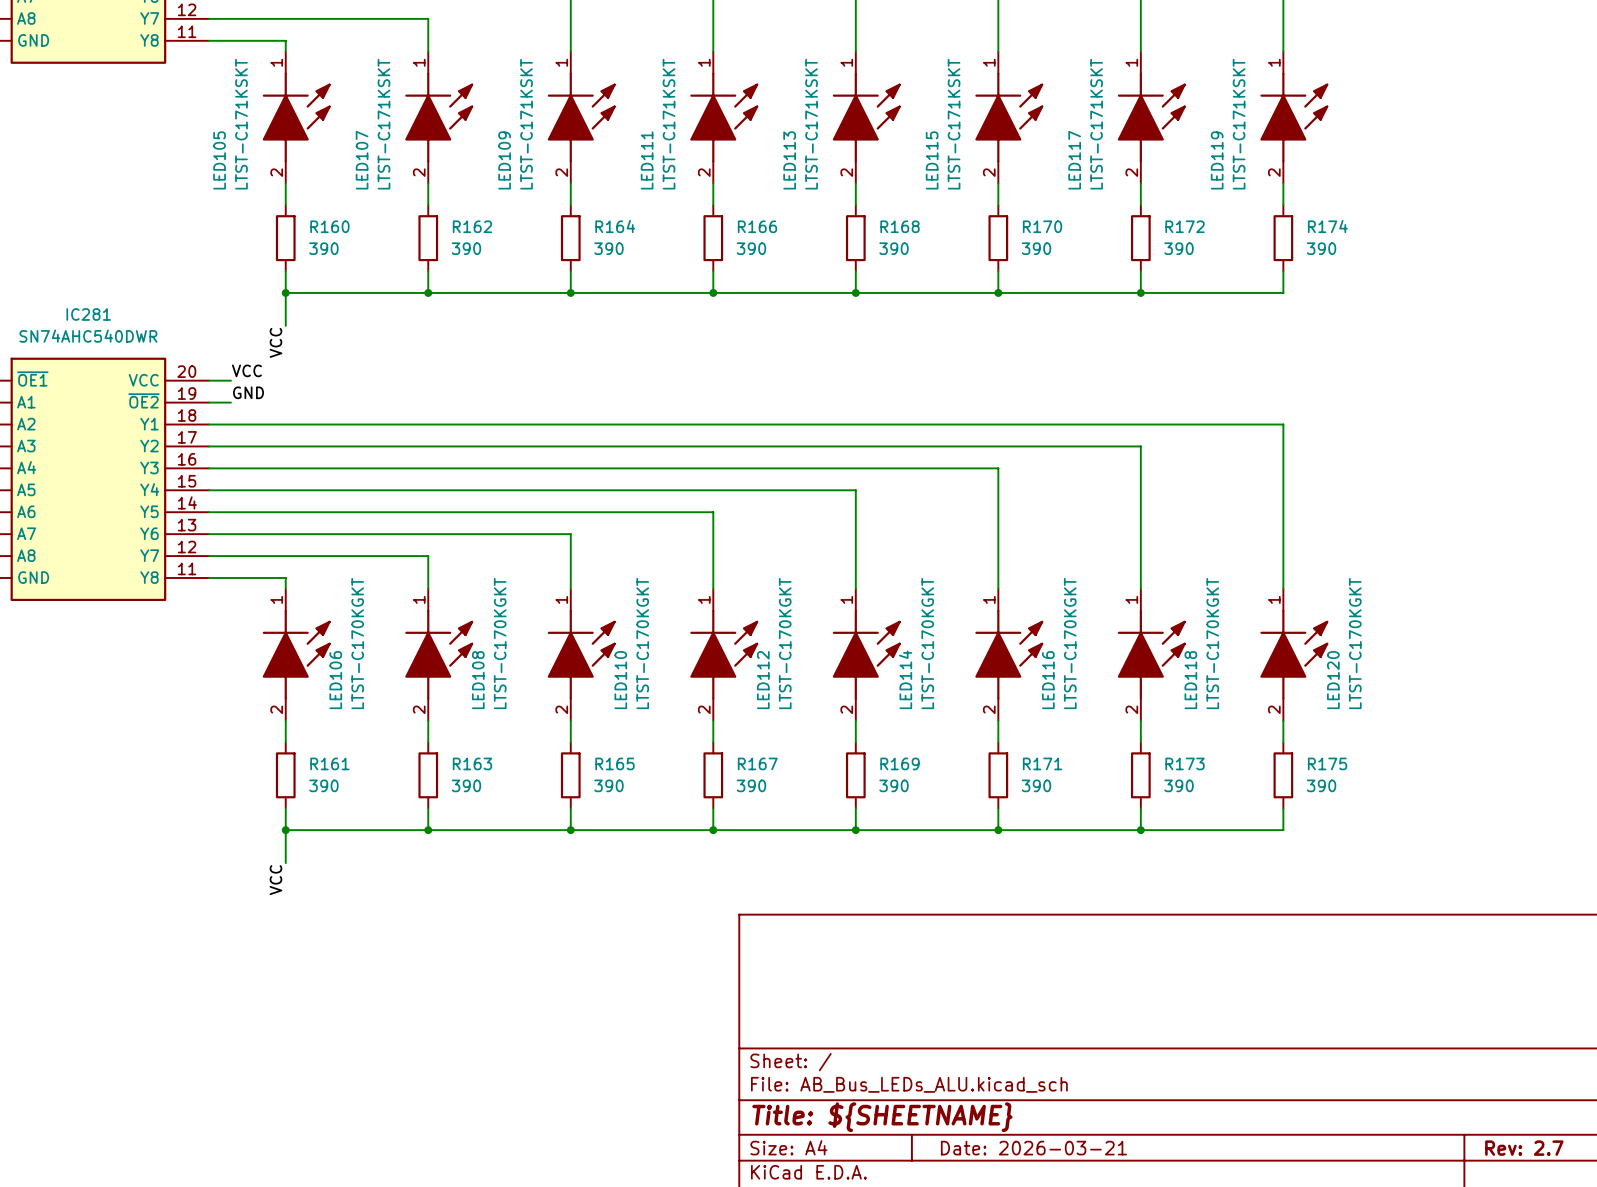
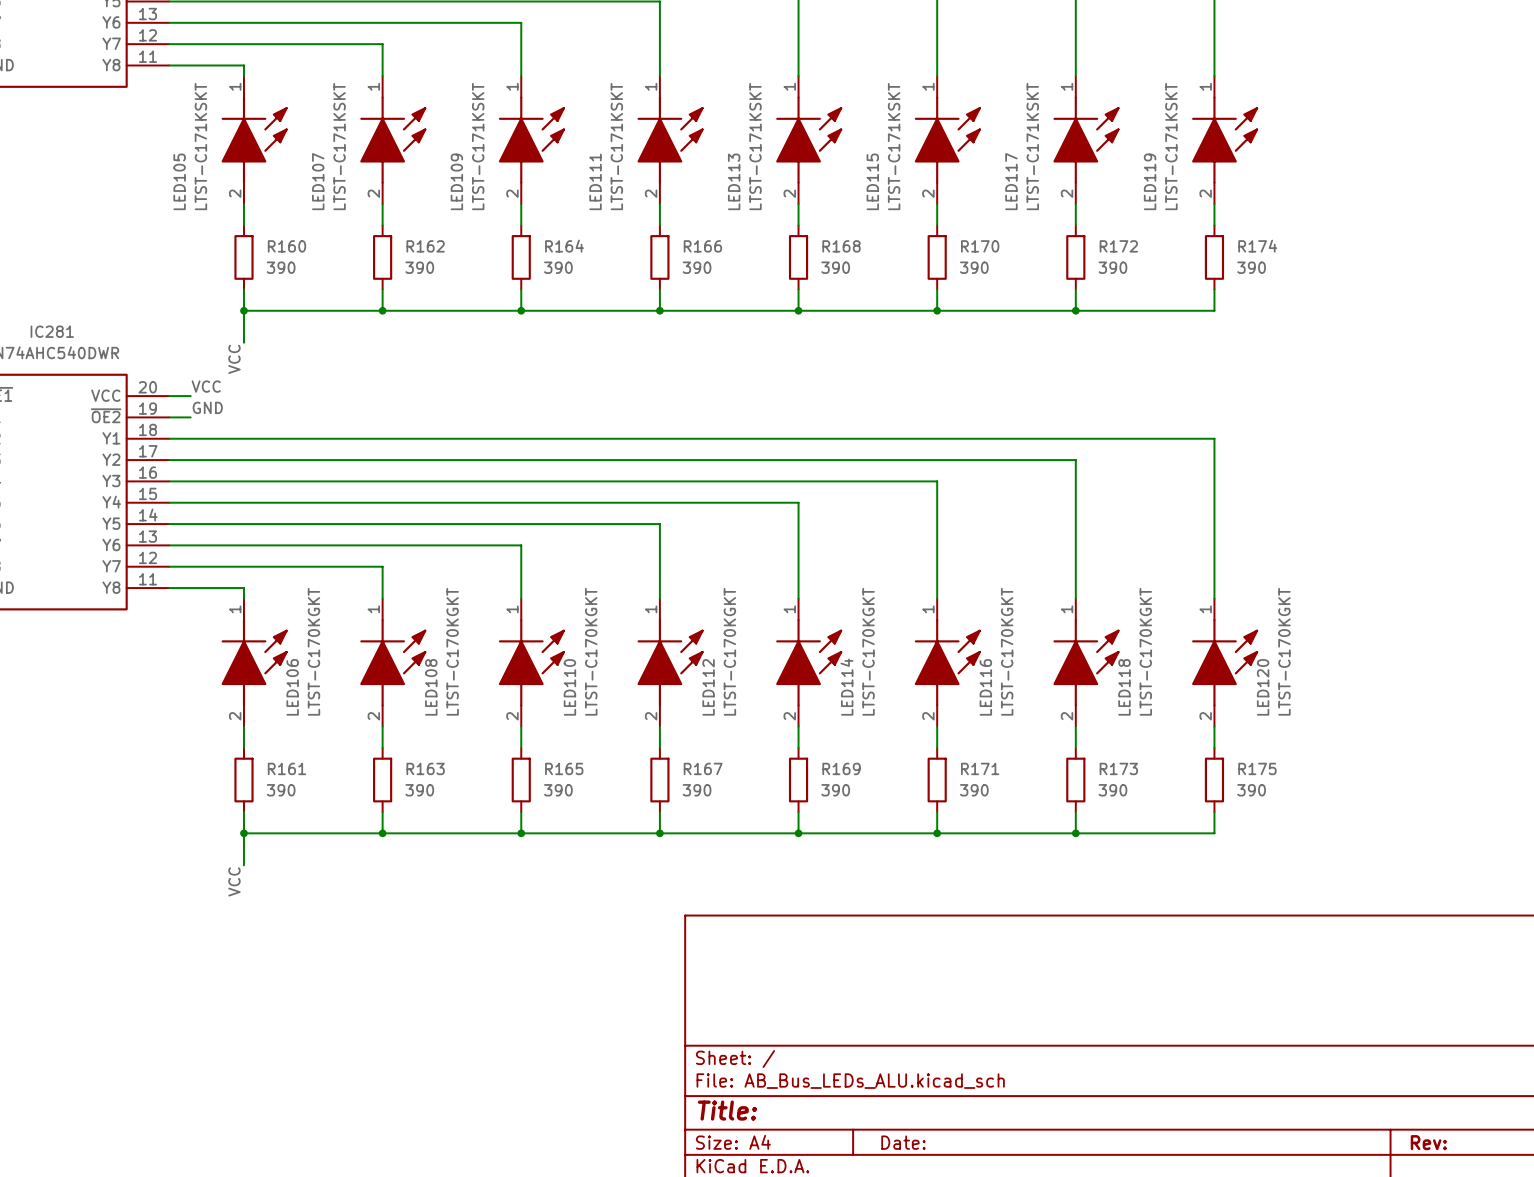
title block: Title: ${SHEETNAME} (882, 1117) -> Title: (727, 1110)
title block: Date: 2026-03-21 (1033, 1148) -> Date: (903, 1142)
title block: Rev: 2.7 (1524, 1148) -> Rev: (1428, 1142)

